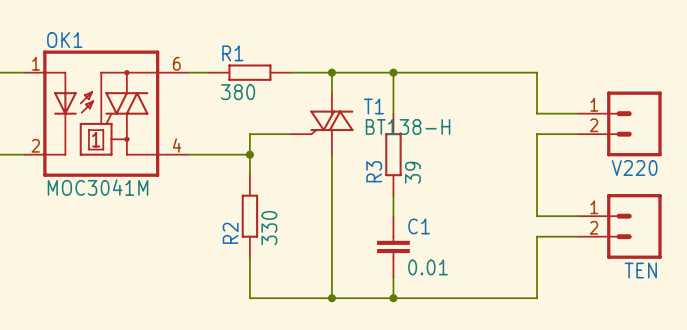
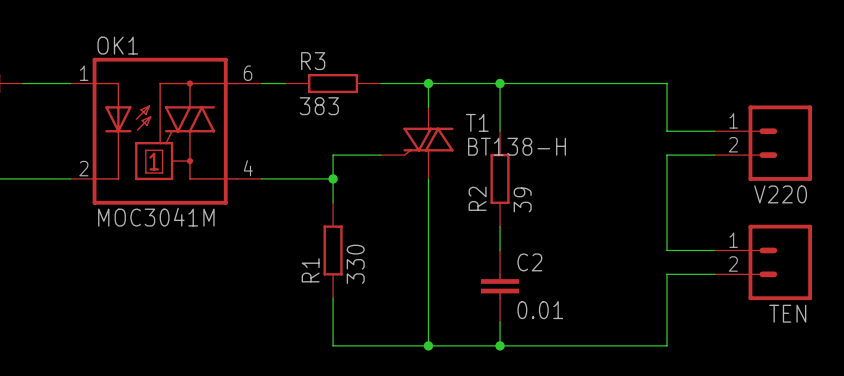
R1 name: R1 (232, 53) -> R3 (313, 61)
R1 value: 380 (238, 92) -> 383 (319, 106)
R3 name: R3 (374, 171) -> R2 (477, 198)
C1 name: C1 (419, 226) -> C2 (529, 262)
R2 name: R2 (230, 233) -> R1 (310, 270)

